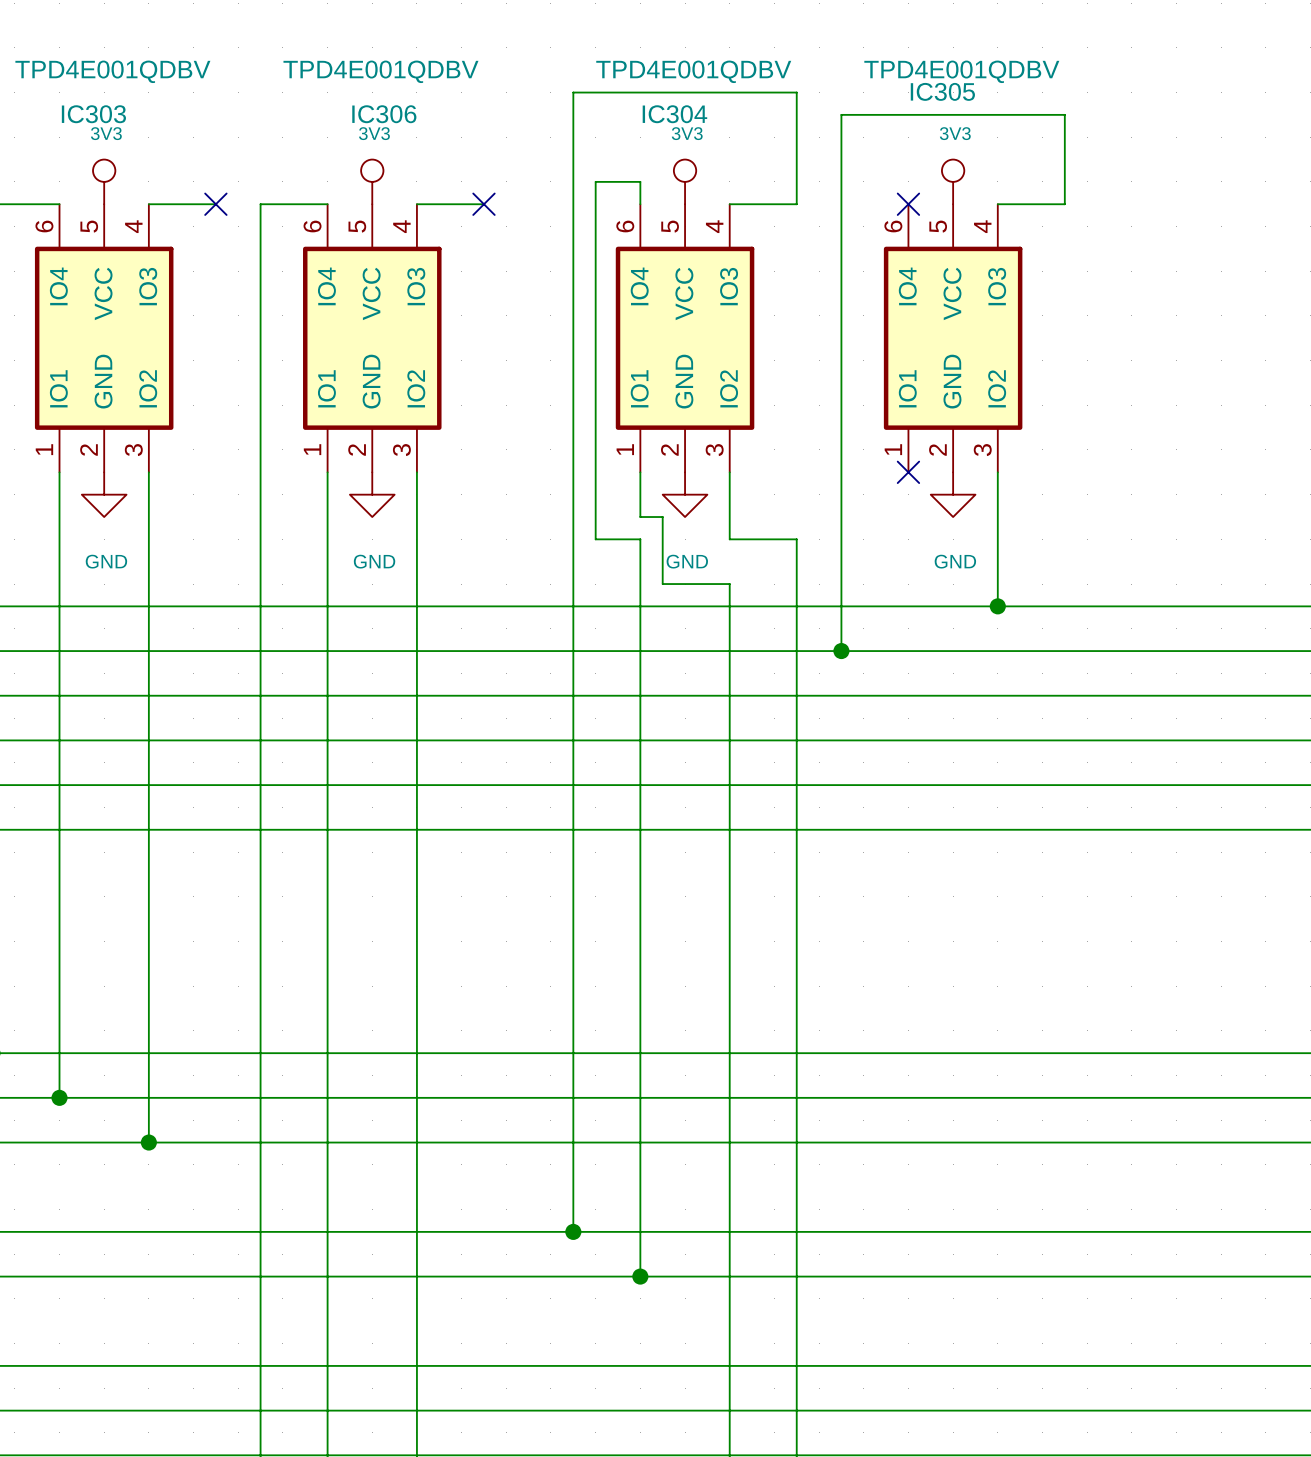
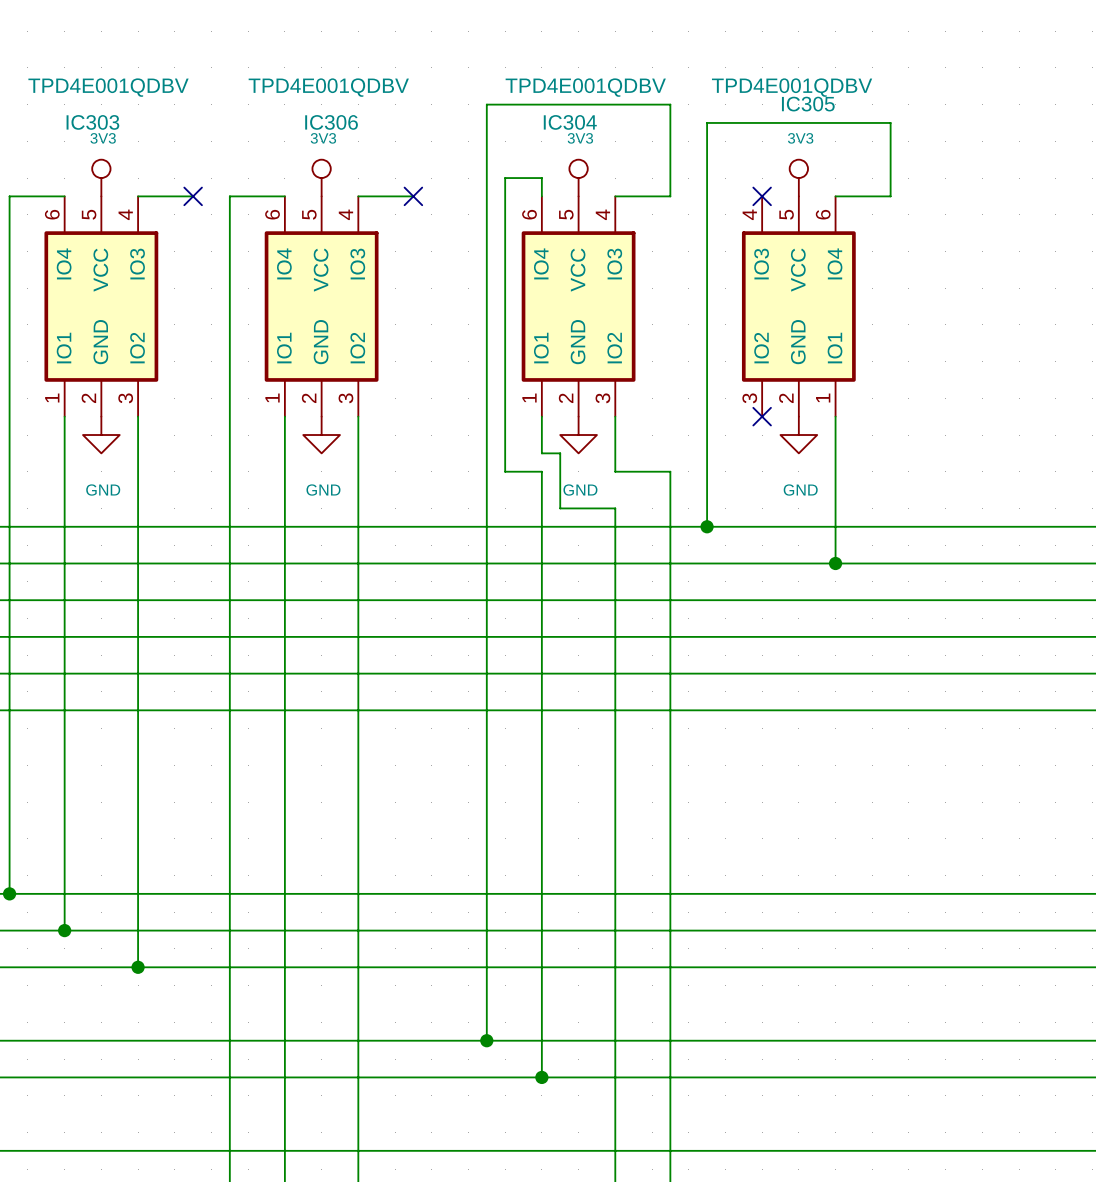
IC305 flip: as is (953, 338) -> left-right (798, 306)
wire: (841, 606) (841, 651) -> (835, 526) (835, 563)
junction position: (997, 606) -> (835, 563)
junction position: (841, 651) -> (707, 526)

